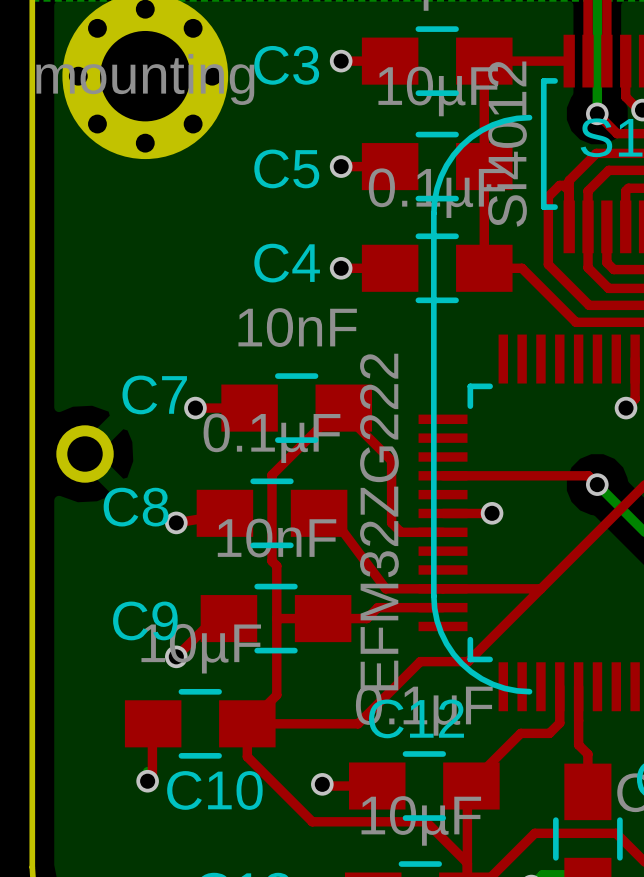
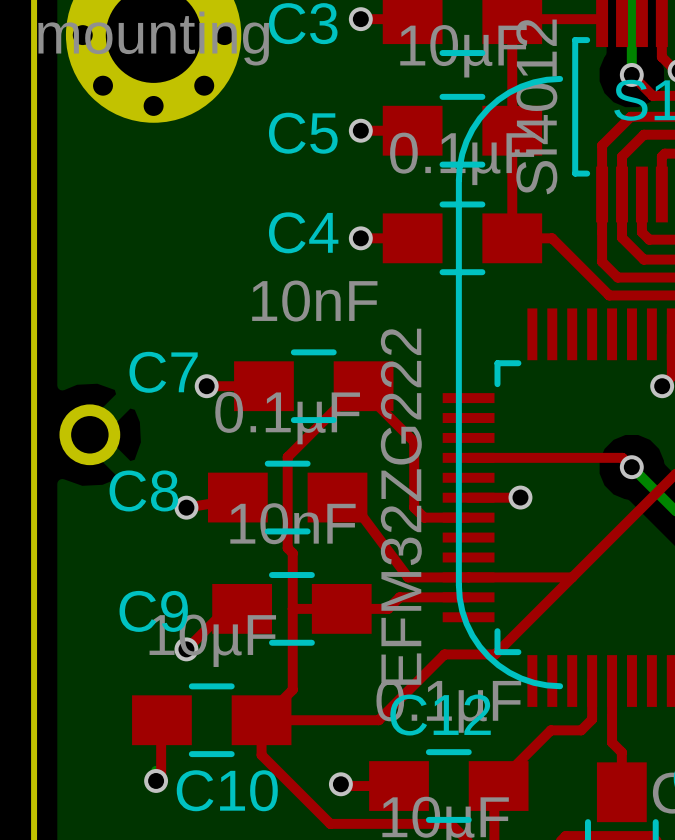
top track: (569, 191) (563, 185) (559, 185) (548, 196) (548, 264) (589, 305) -> (602, 194) (602, 261) (617, 277) (623, 277)

